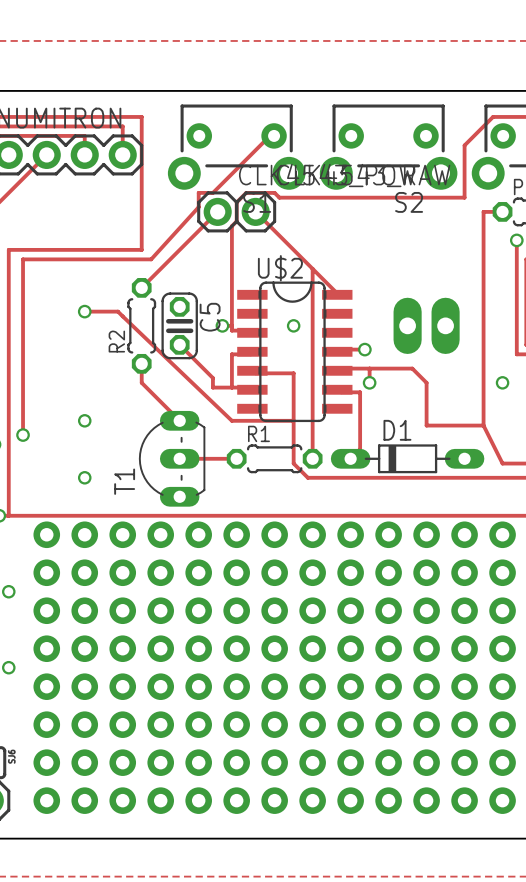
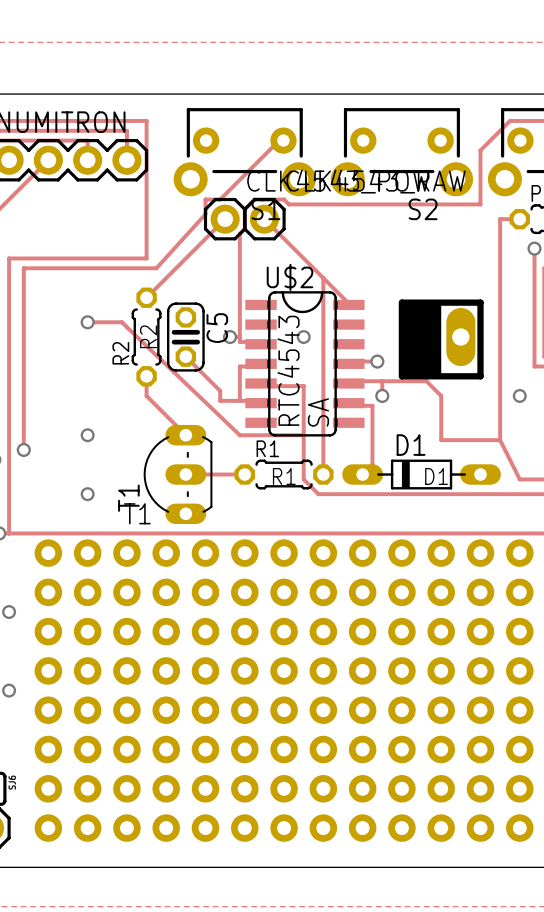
line: none -> (401, 302) (480, 302) (480, 376) (401, 376) (401, 302)
drawing: none -> [401, 302, 442, 377]
text: none -> R2 (148, 336)
text: none -> RTC4543 (288, 370)
text: none -> SA (318, 412)
text: none -> R1 (284, 476)
text: none -> D1 (436, 476)
text: none -> T1 (137, 513)

